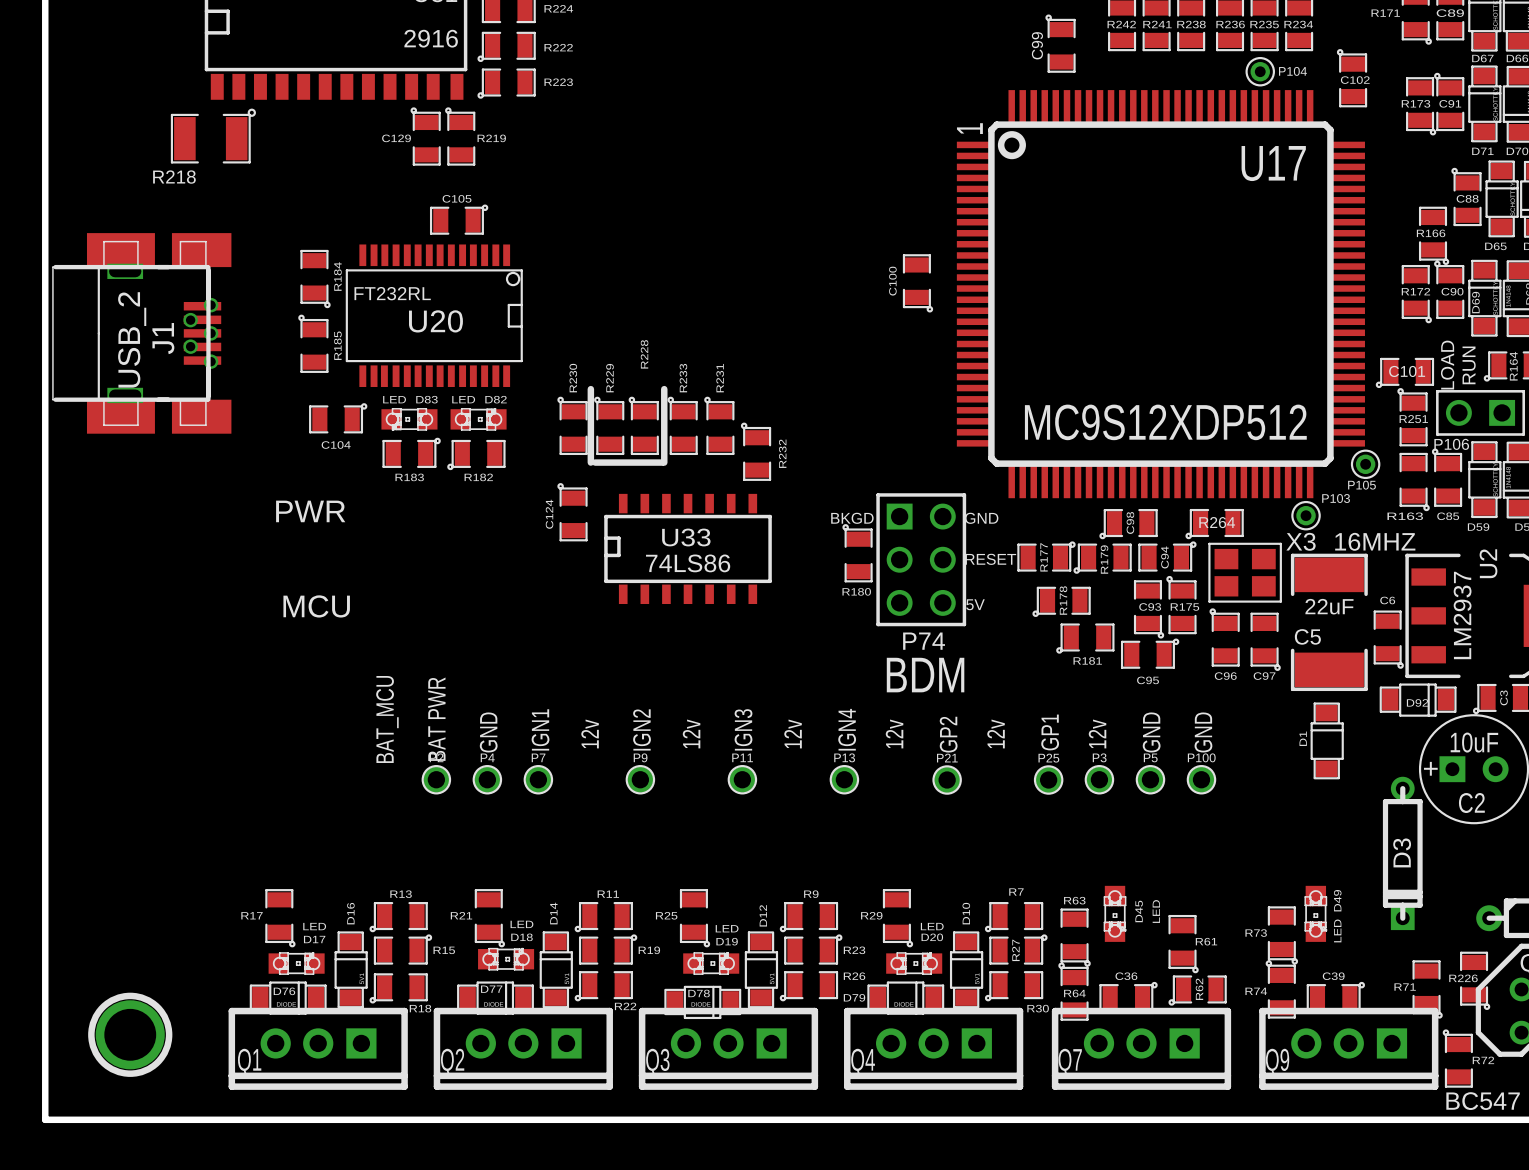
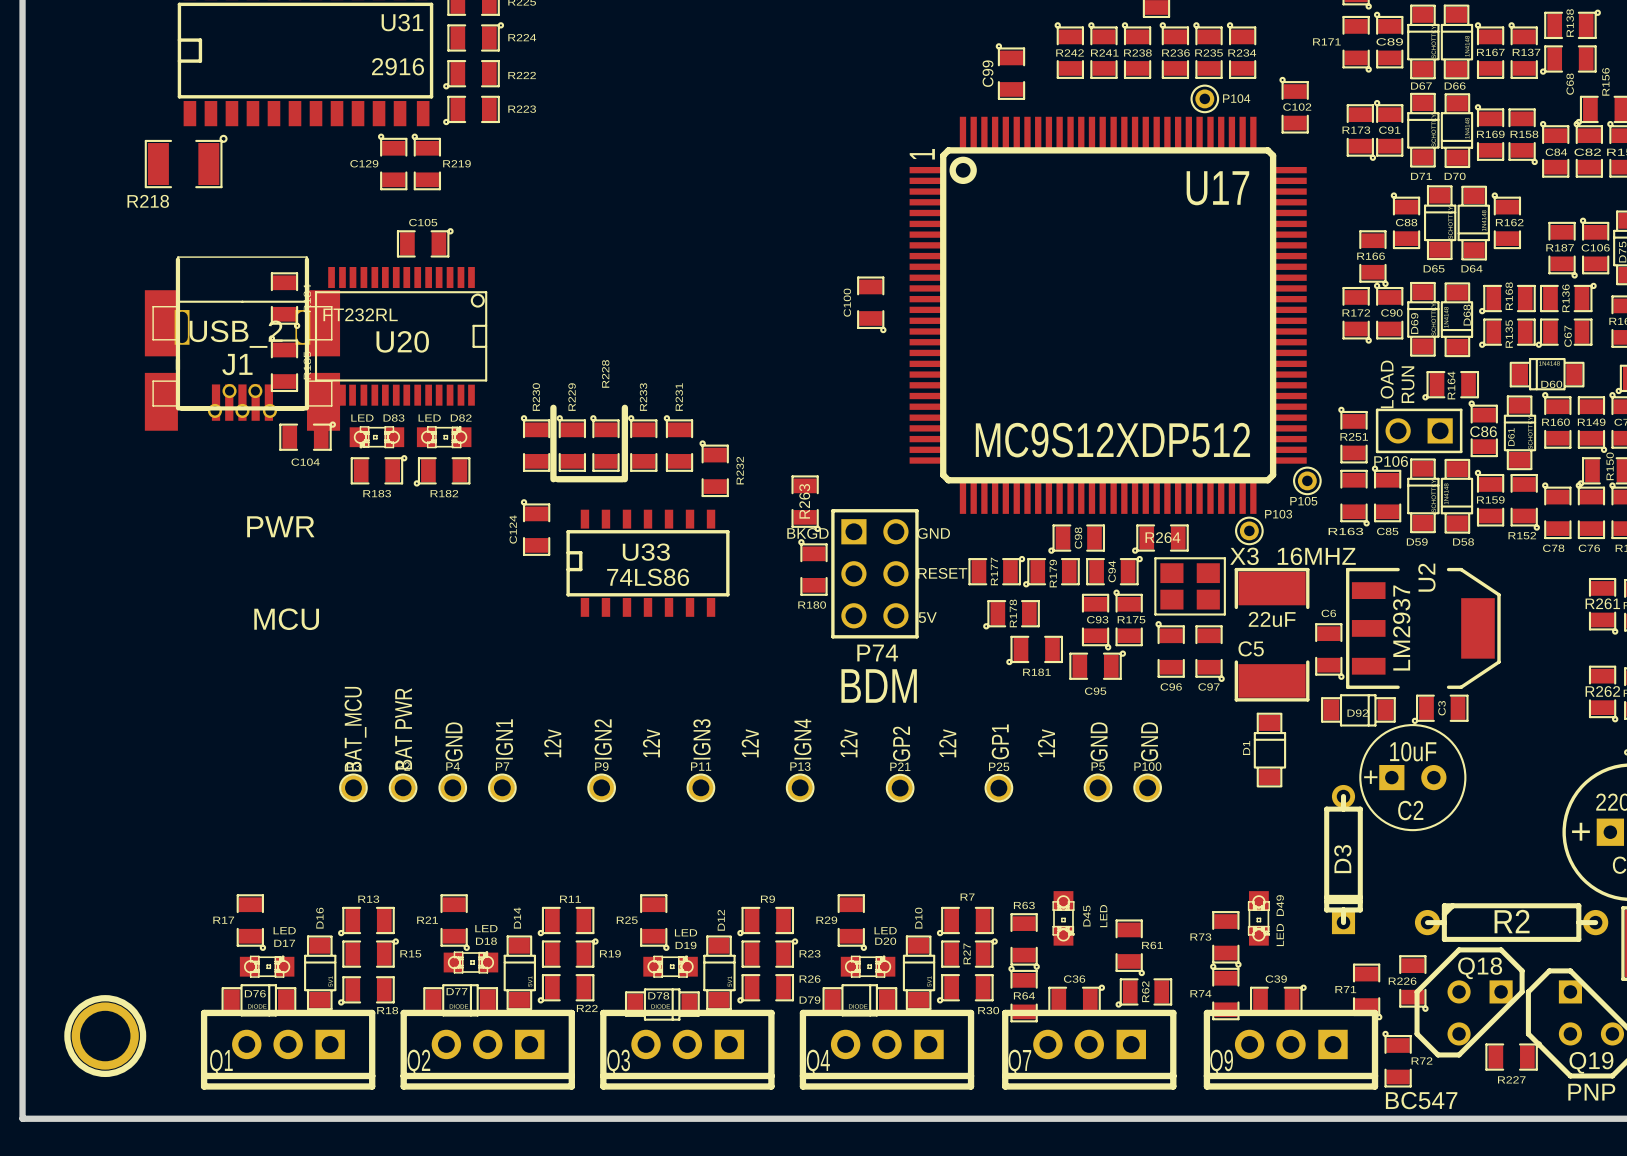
J1 rotation: 0° (141, 333) -> 90° clockwise (242, 343)
J1 position: (141, 333) -> (242, 343)
C101: (1404, 372) -> none
R263: none -> (806, 503)
P3 position: (1099, 779) -> (353, 787)

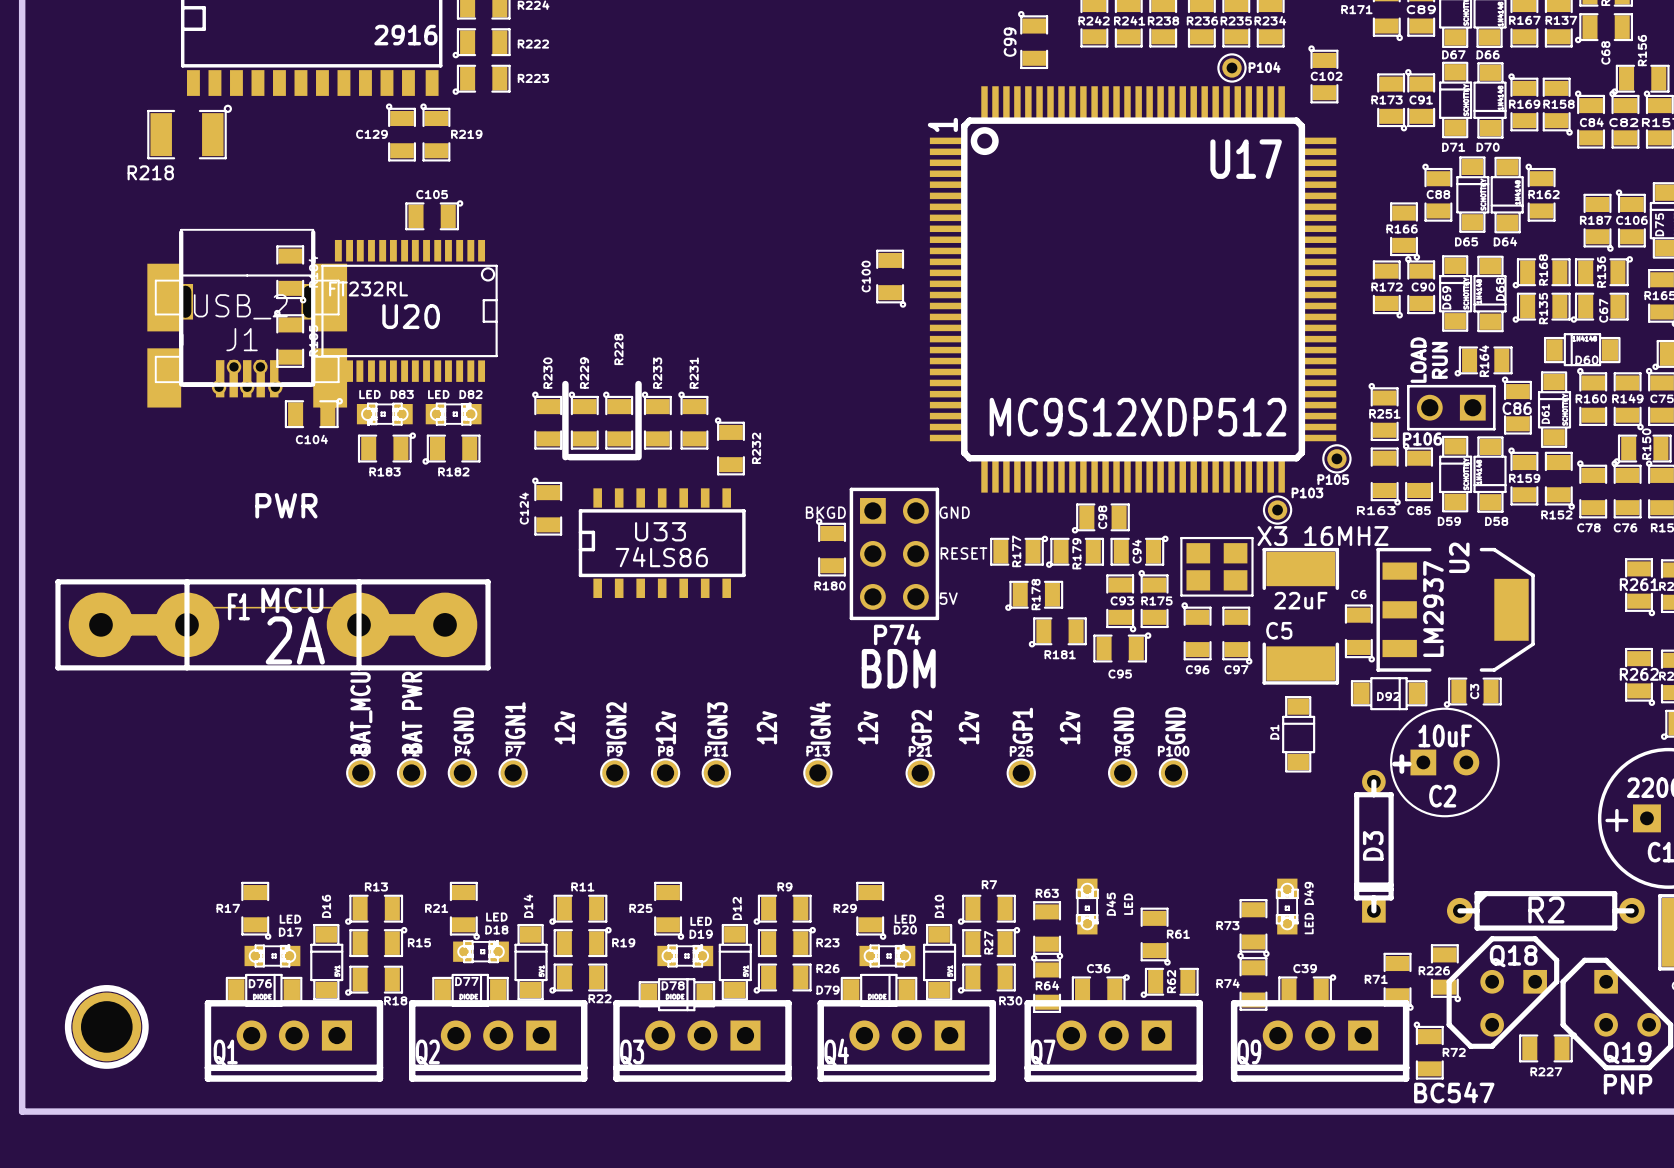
R263: (806, 503) -> none
R264: (1160, 539) -> none
F1: none -> 2A (273, 624)
P8: none -> (665, 772)

